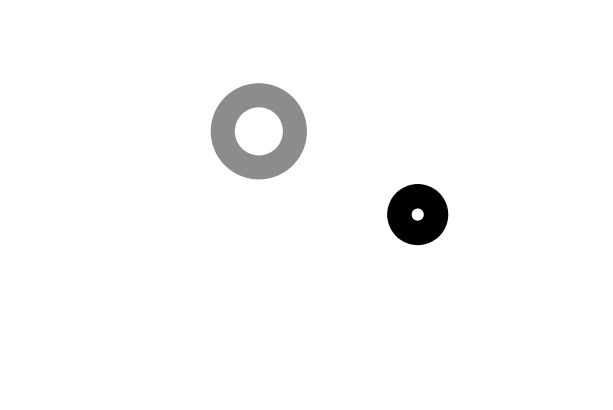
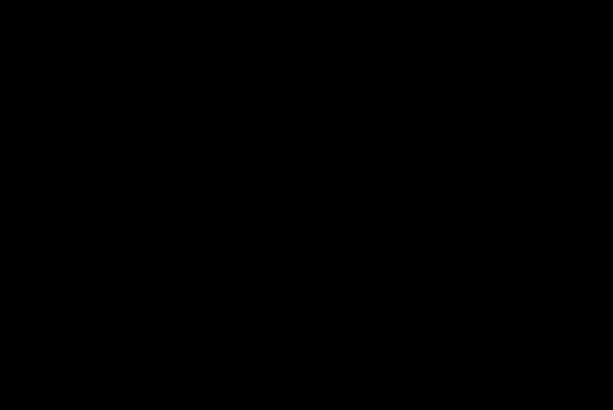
part: (258, 131) -> none
part: (417, 214) -> none

